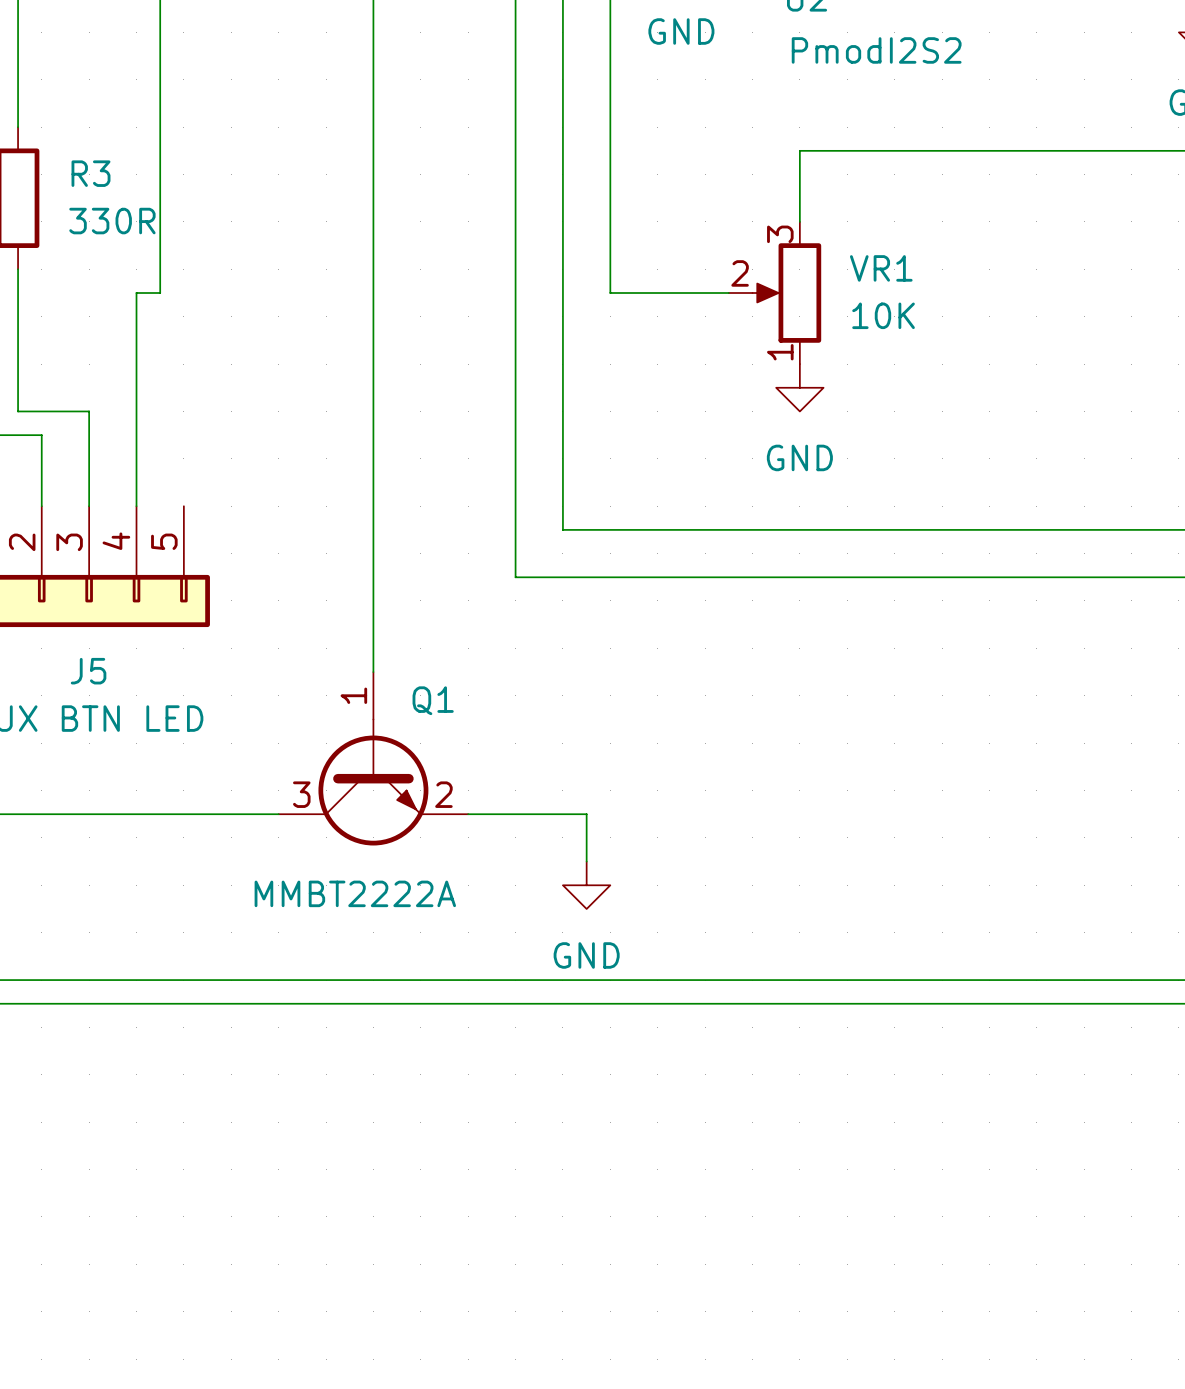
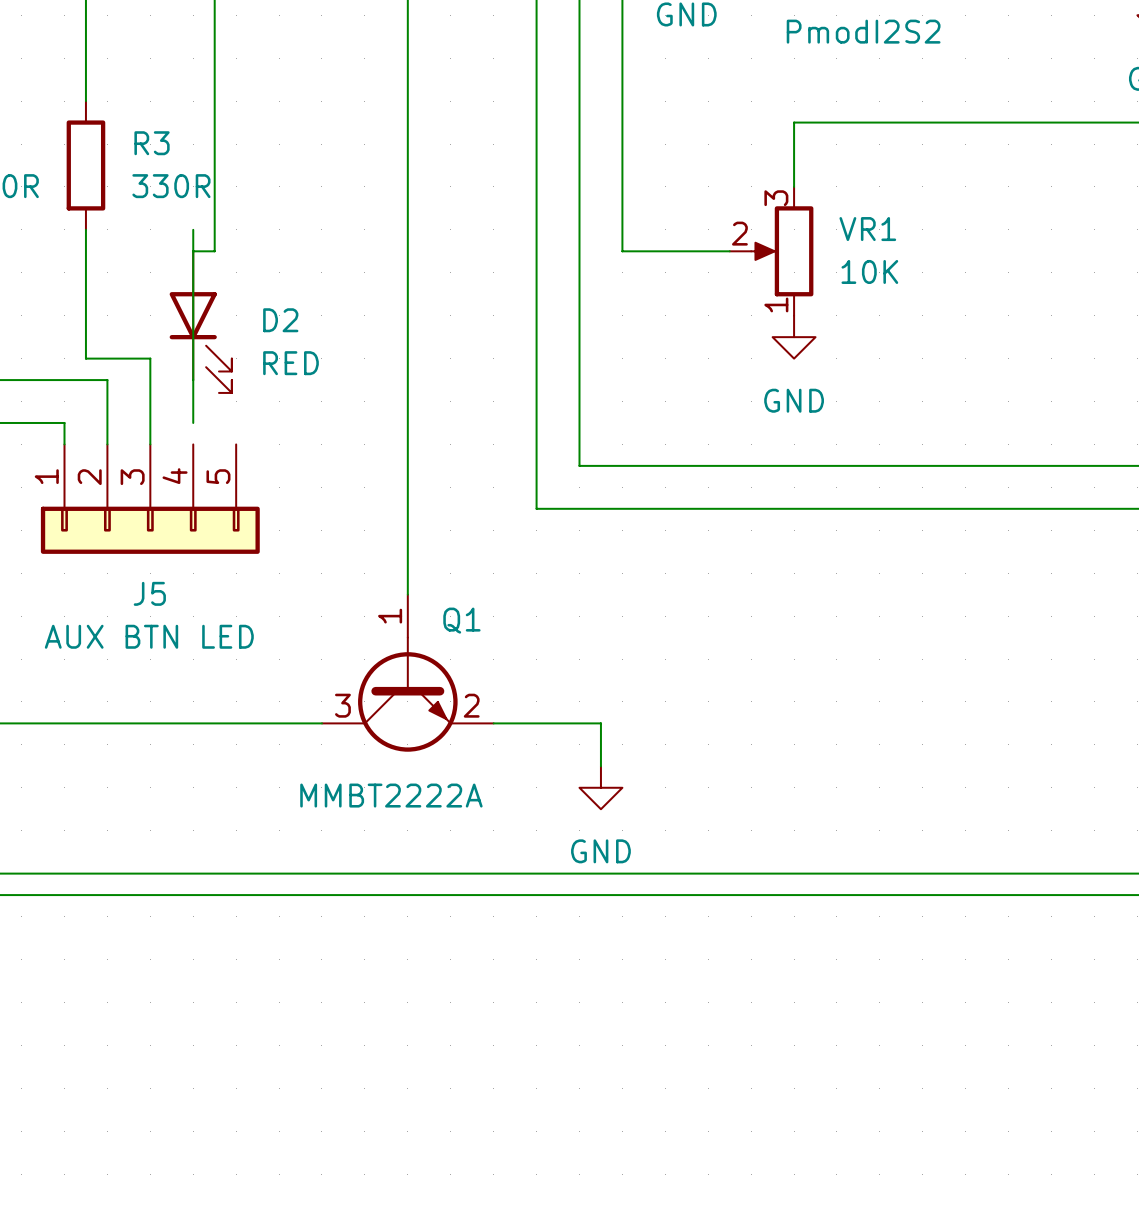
D2: none -> RED (200, 322)
wire: (136, 482) (136, 506) -> (193, 229) (193, 251)

